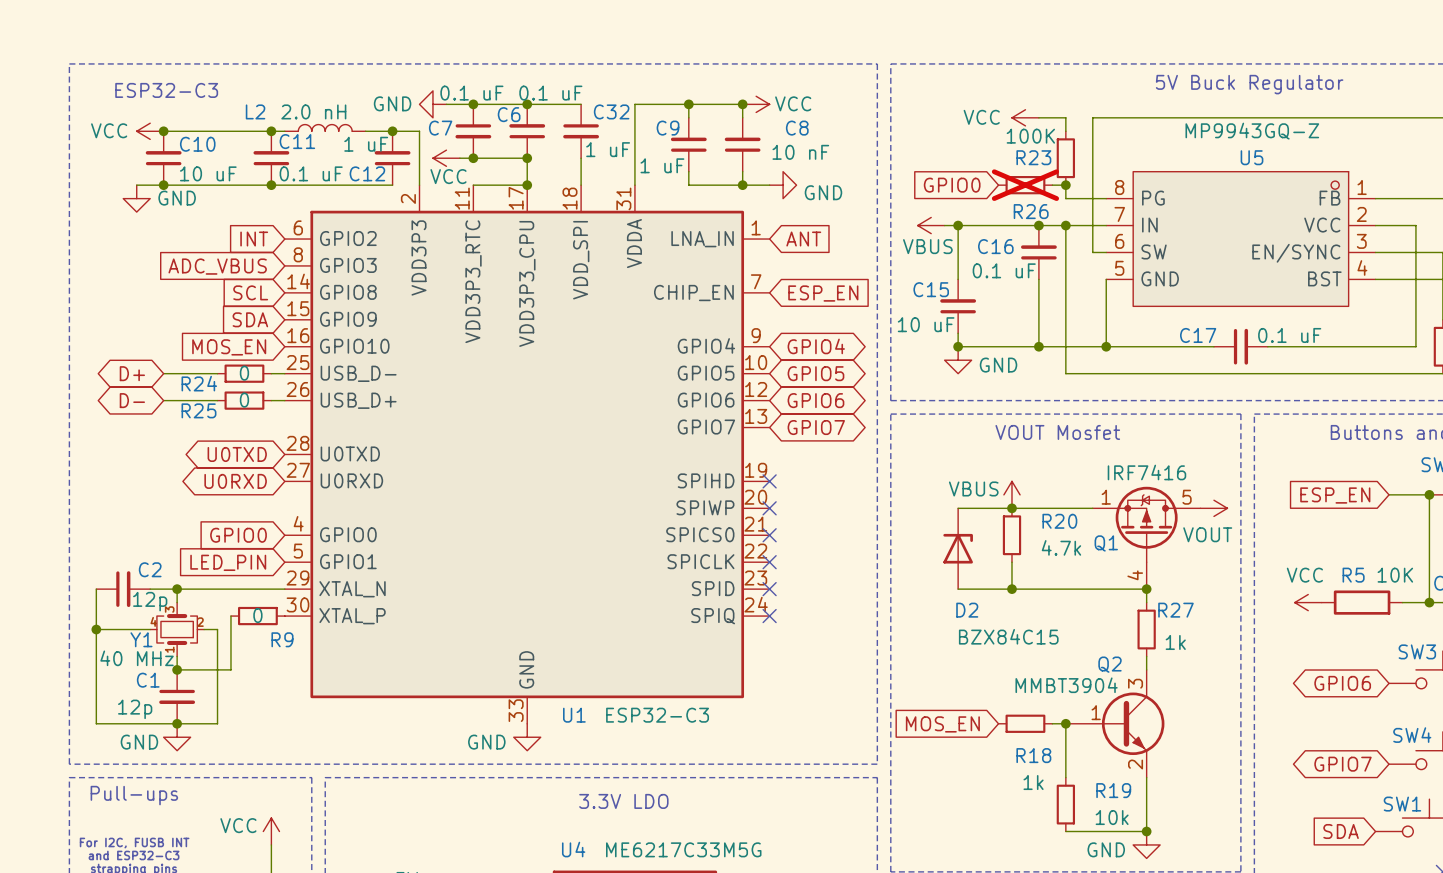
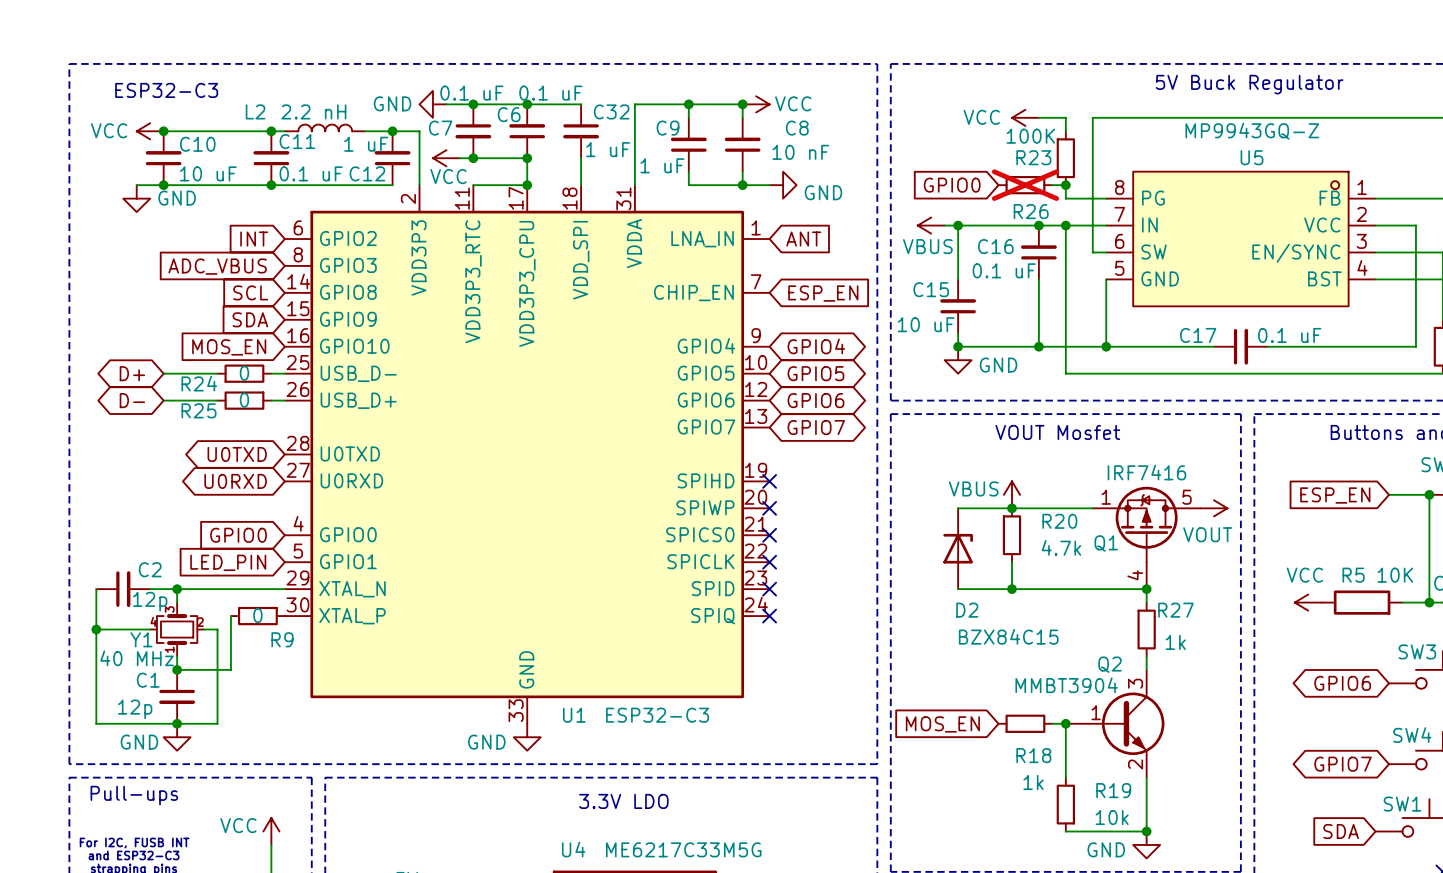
L2 value: 2.0 nH (313, 111) -> 2.2 nH (313, 111)

